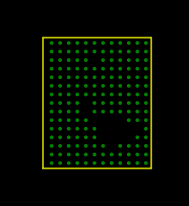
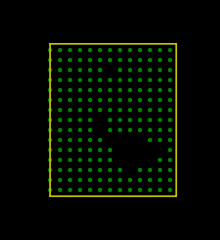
part footprint: [49, 41, 148, 165] -> [47, 47, 173, 193]

